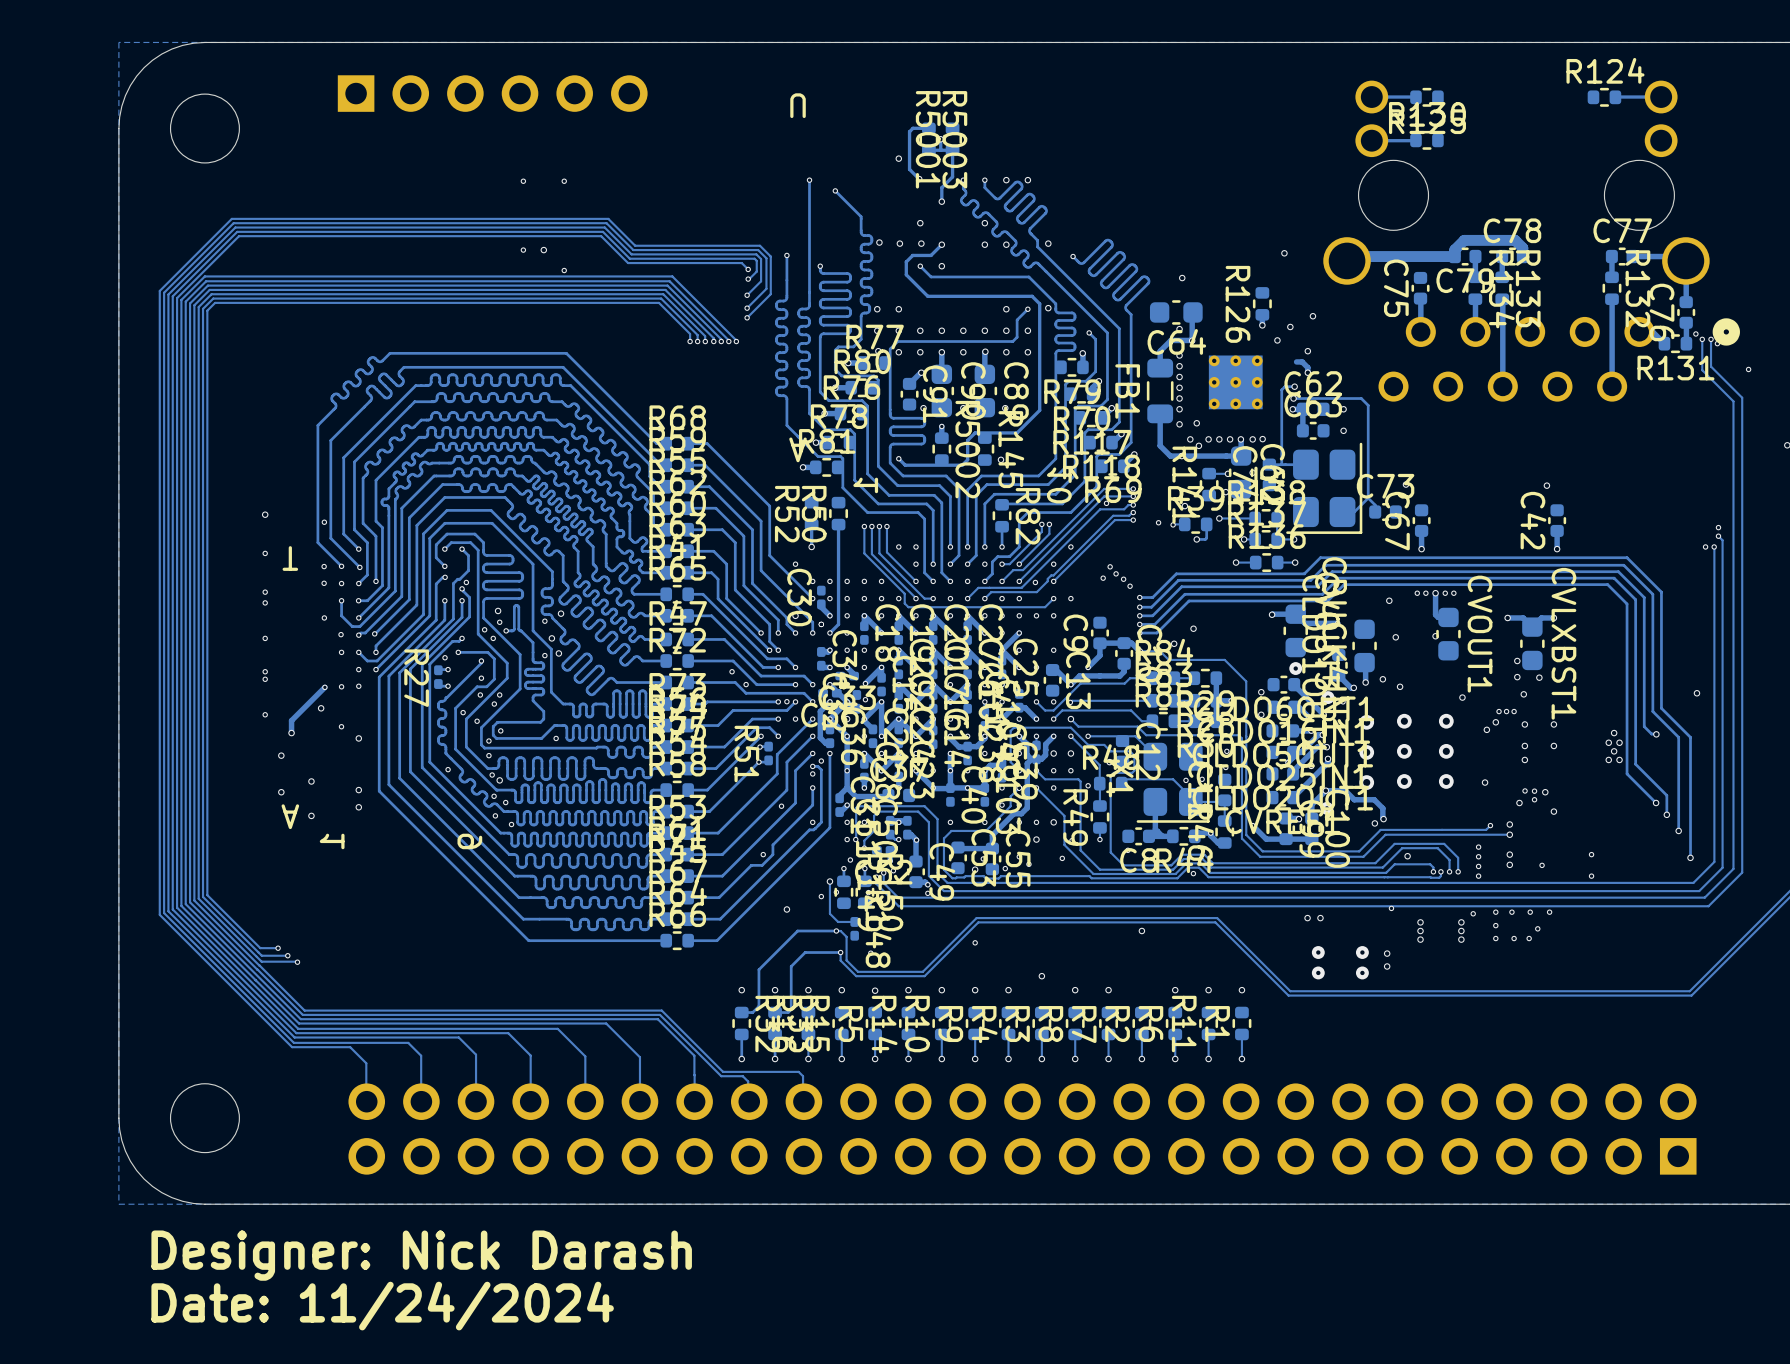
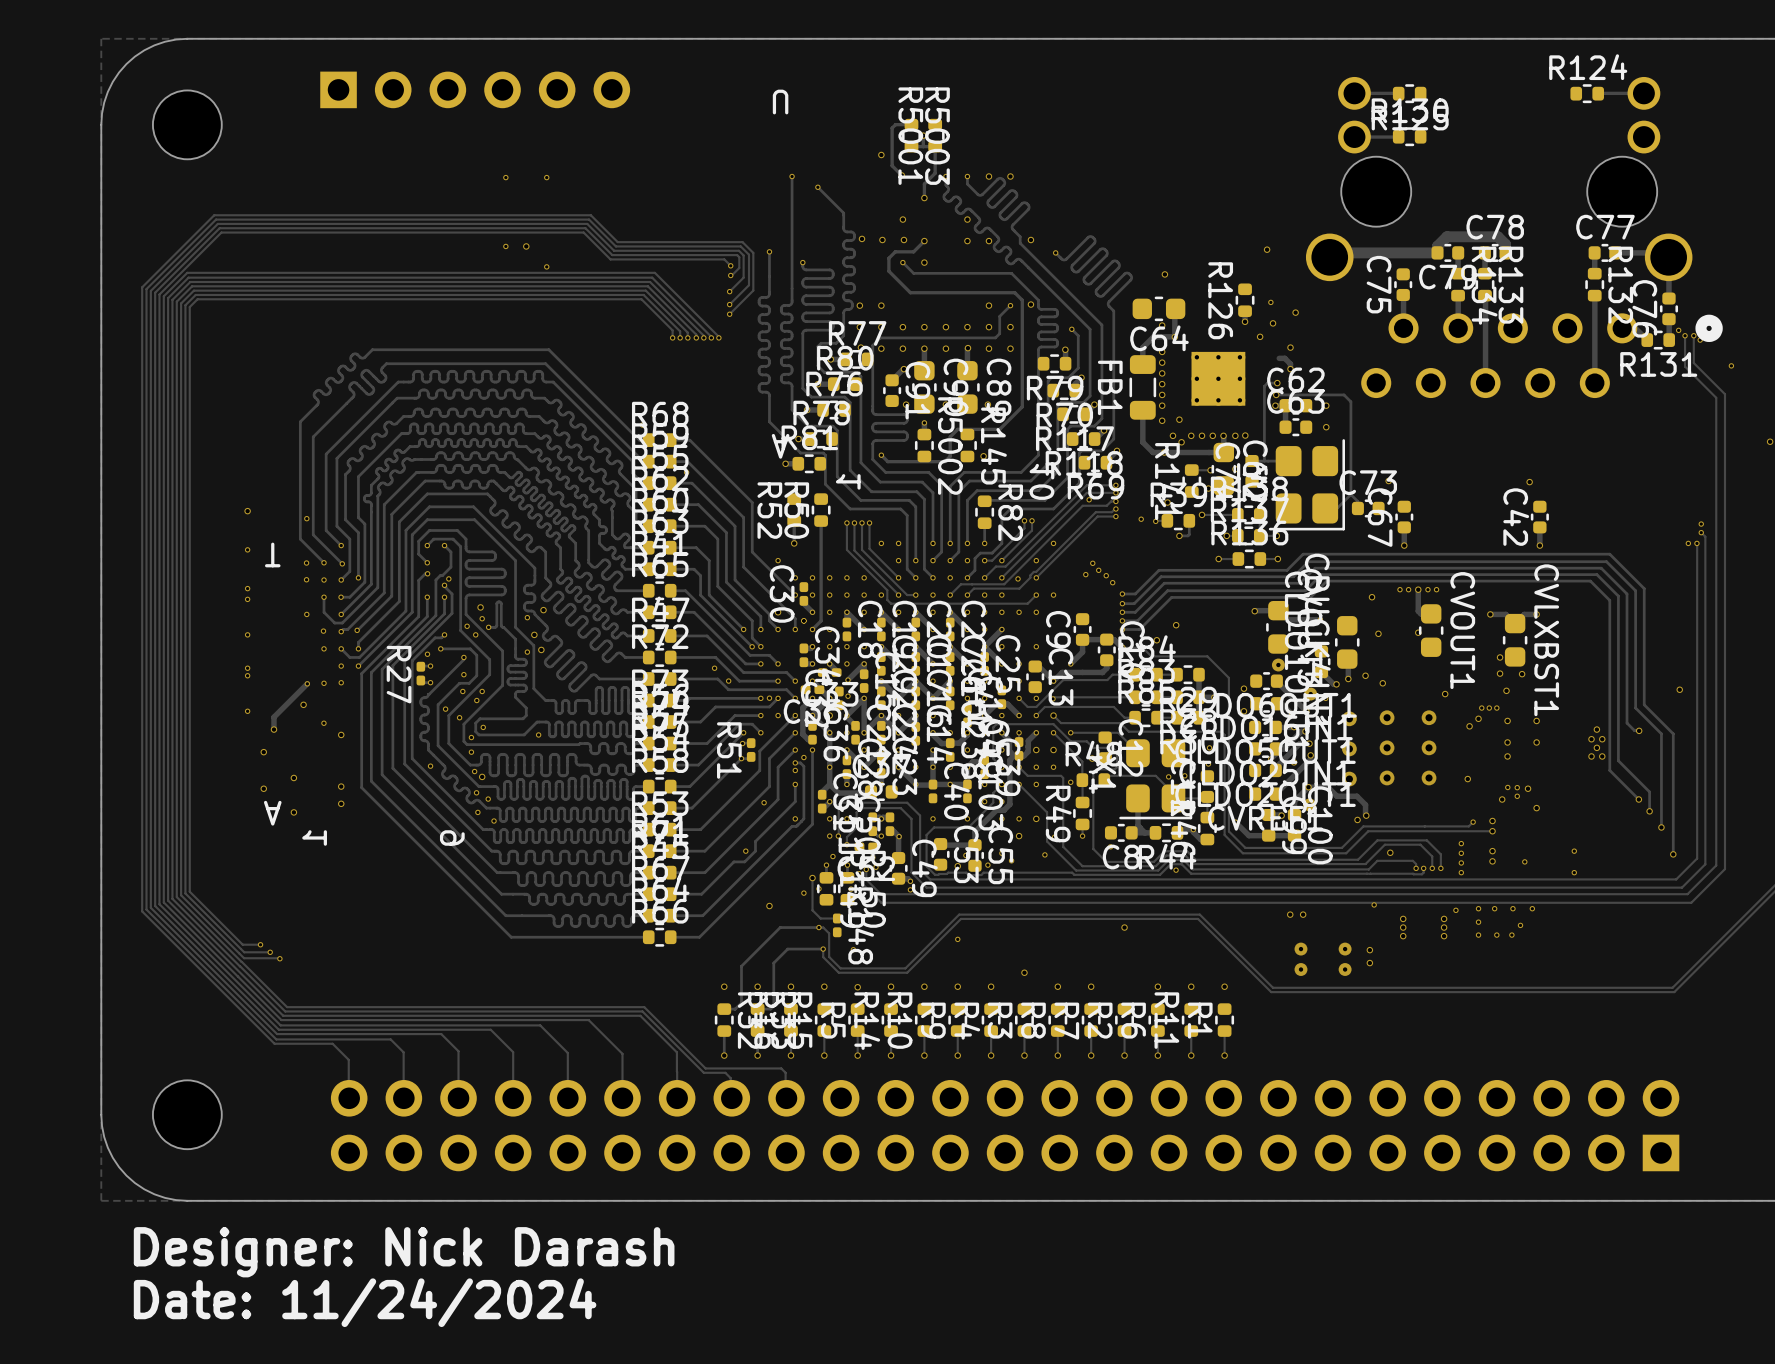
via: none -> (1270, 302)

